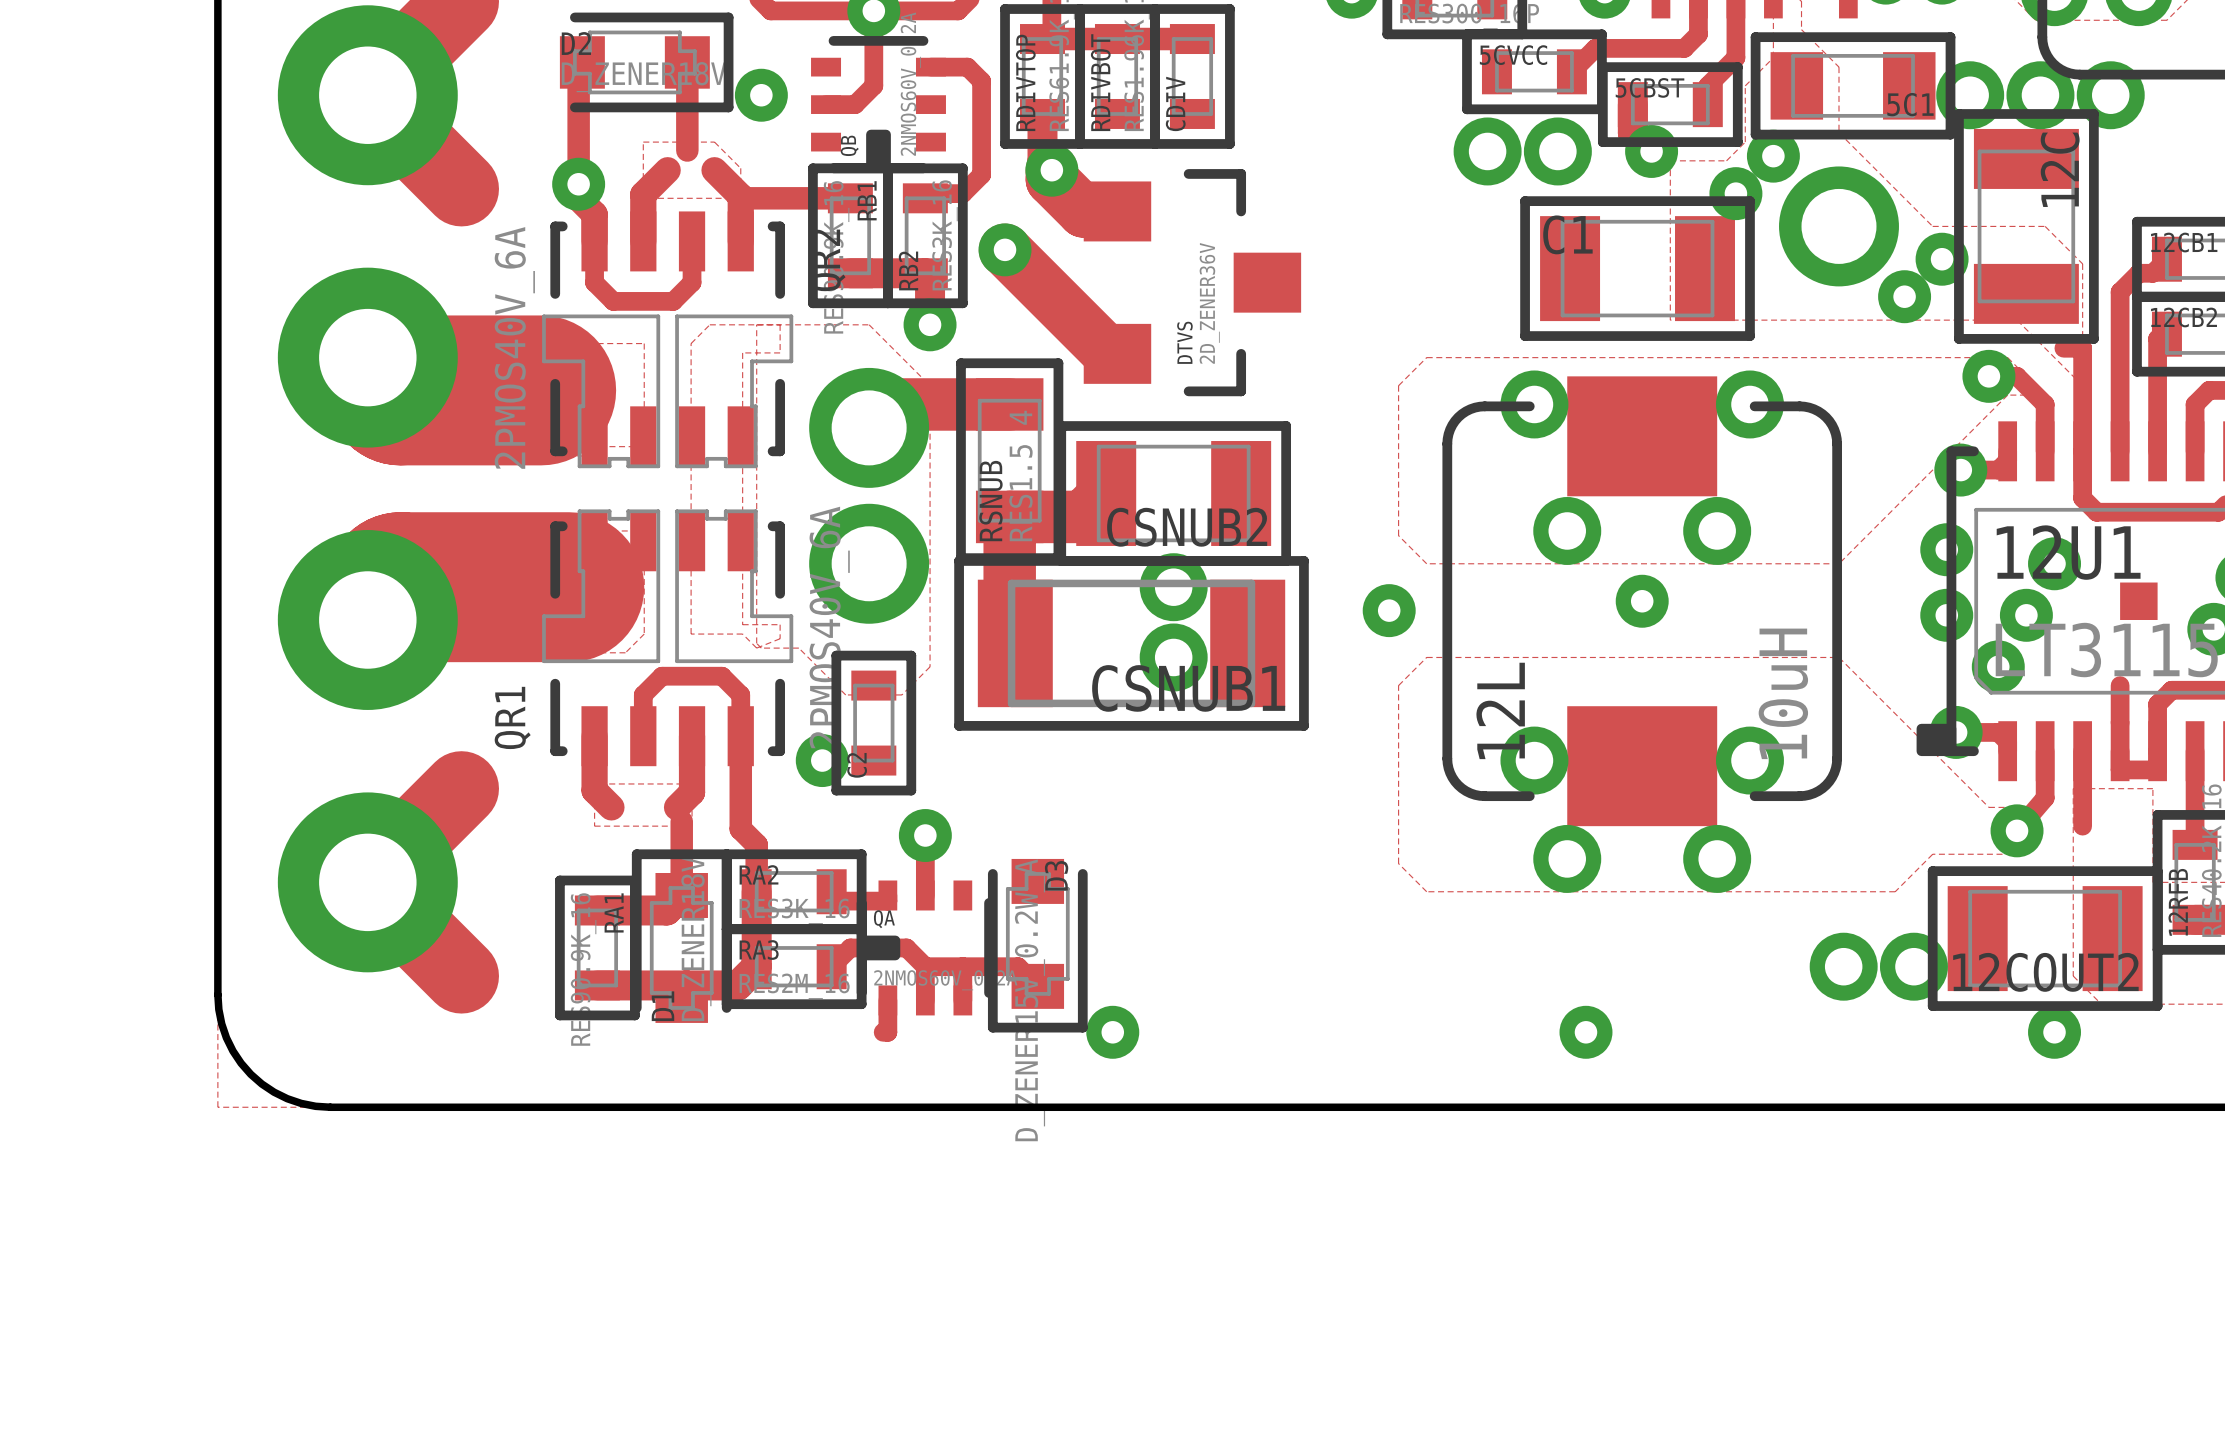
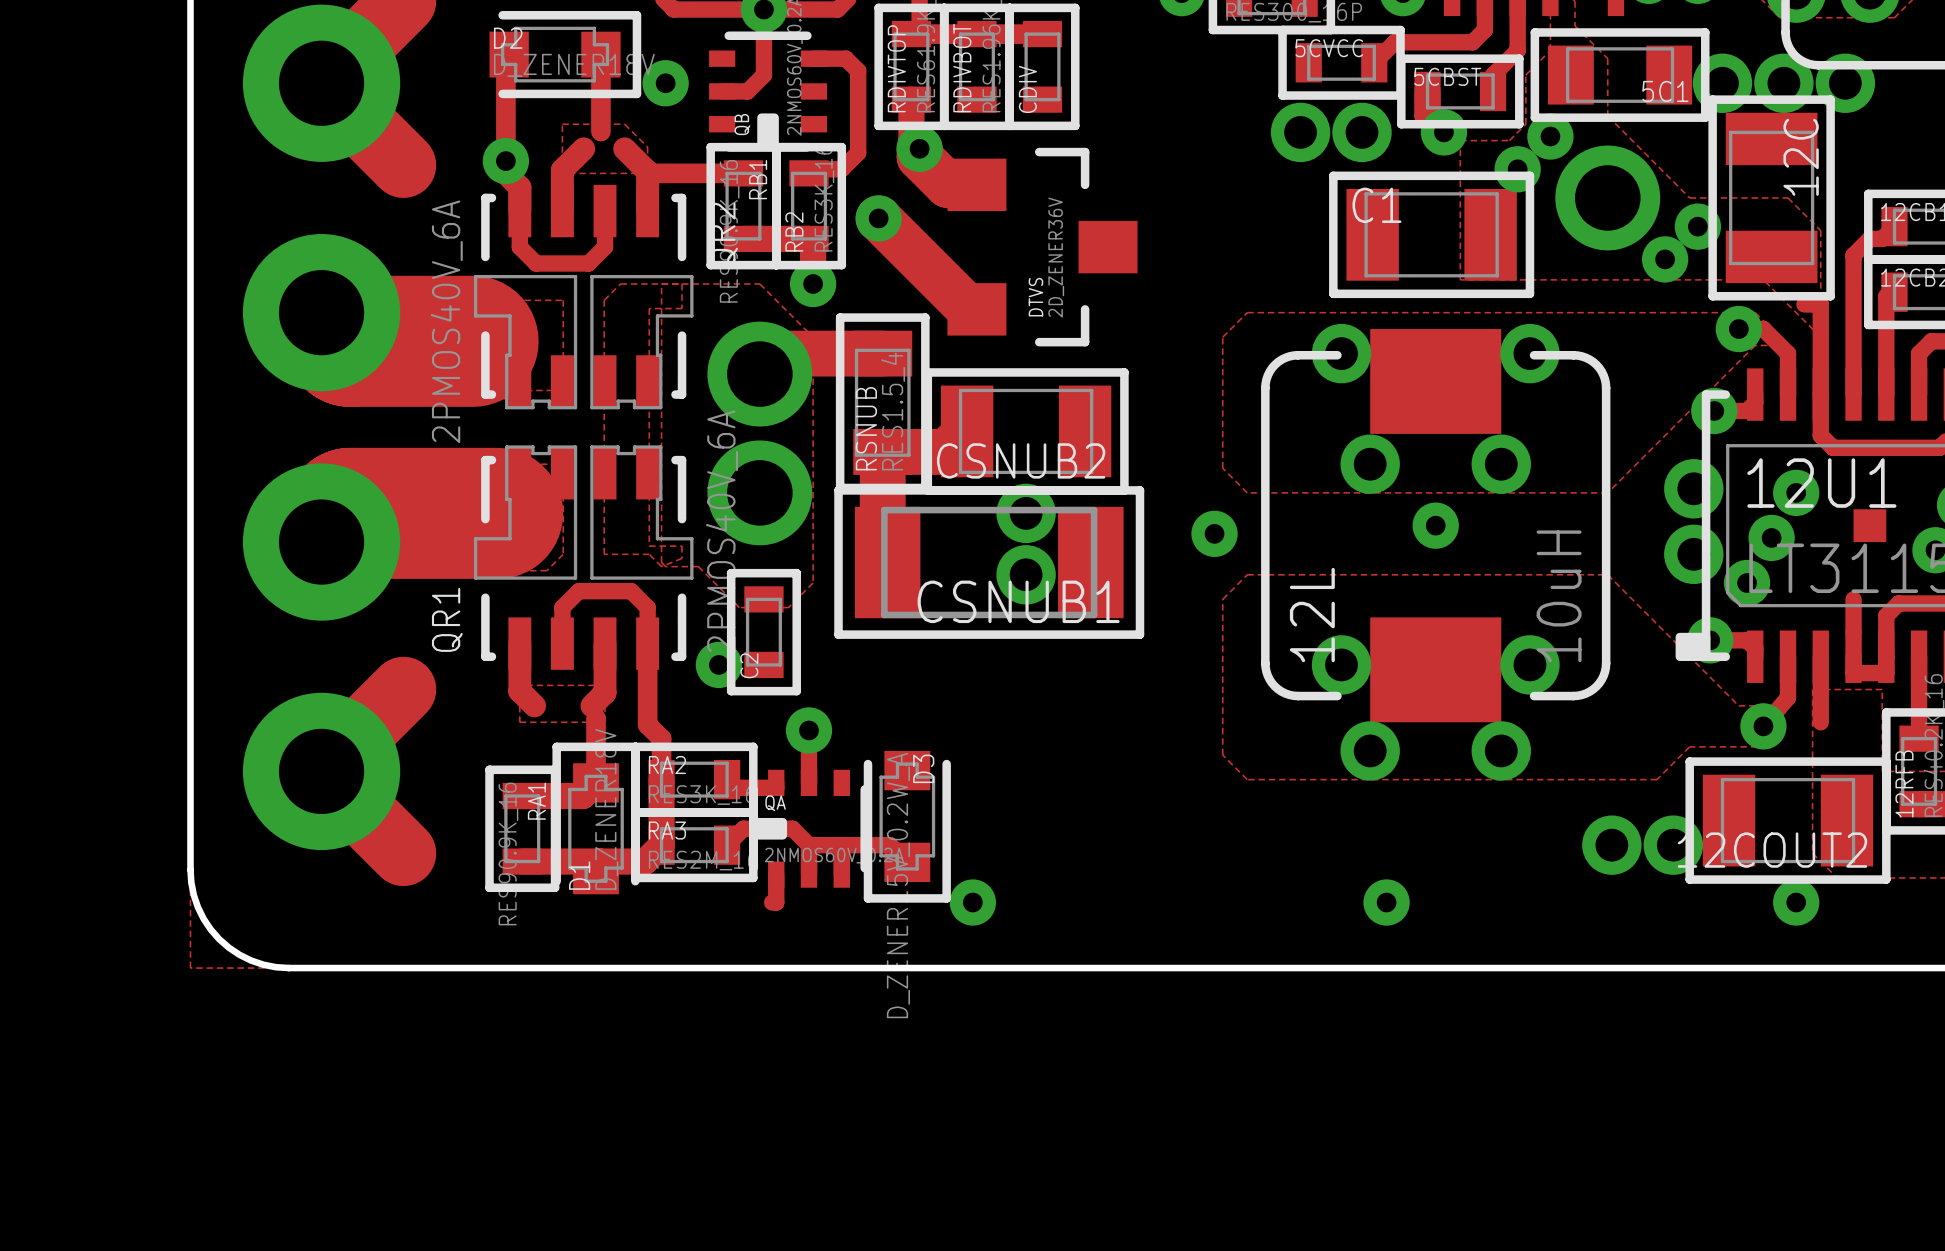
via size: [1920, 523, 1974, 577] -> [1664, 459, 1724, 519]
via size: [1920, 588, 1974, 642] -> [1664, 524, 1724, 585]

